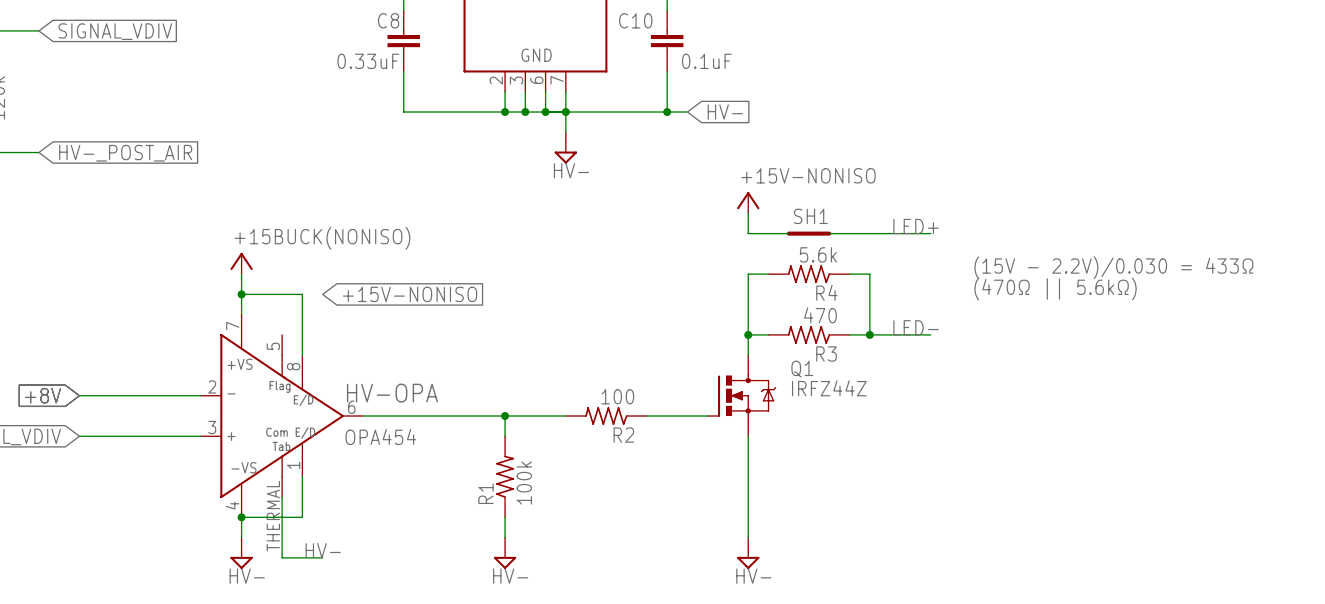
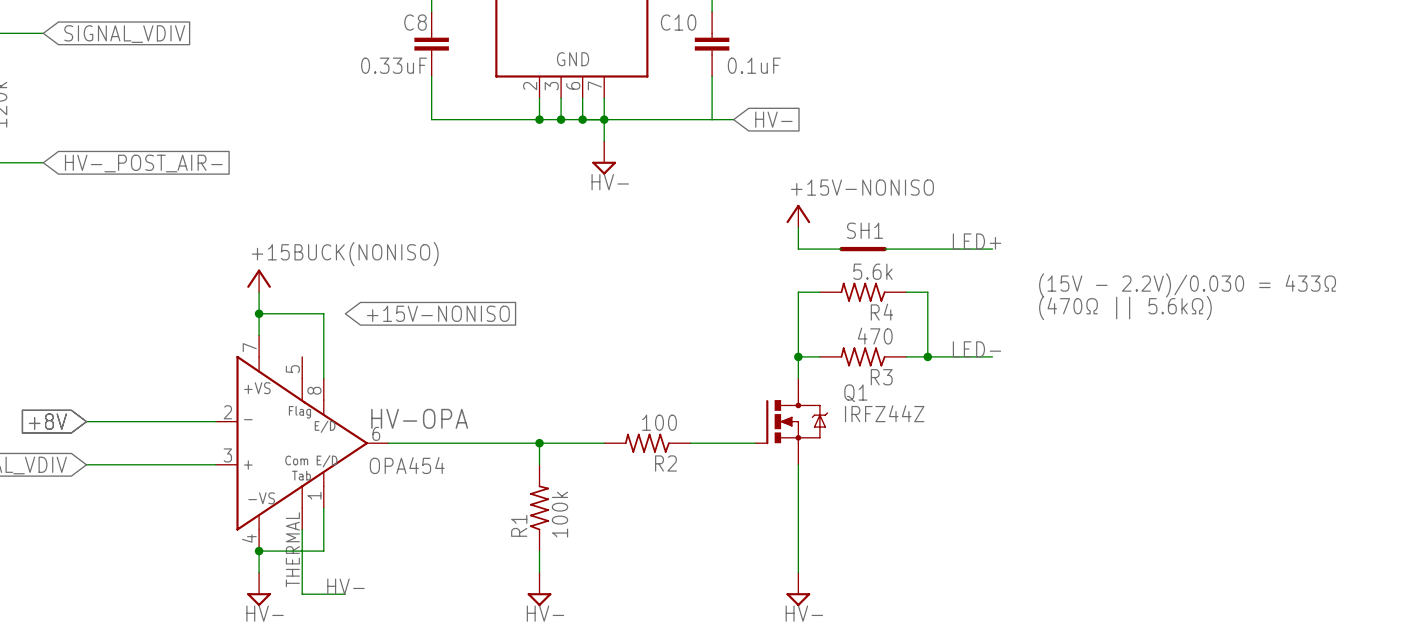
junction: (667, 112) -> none
global label: HV-_POST_AIR (125, 153) -> HV-_POST_AIR- (143, 163)

